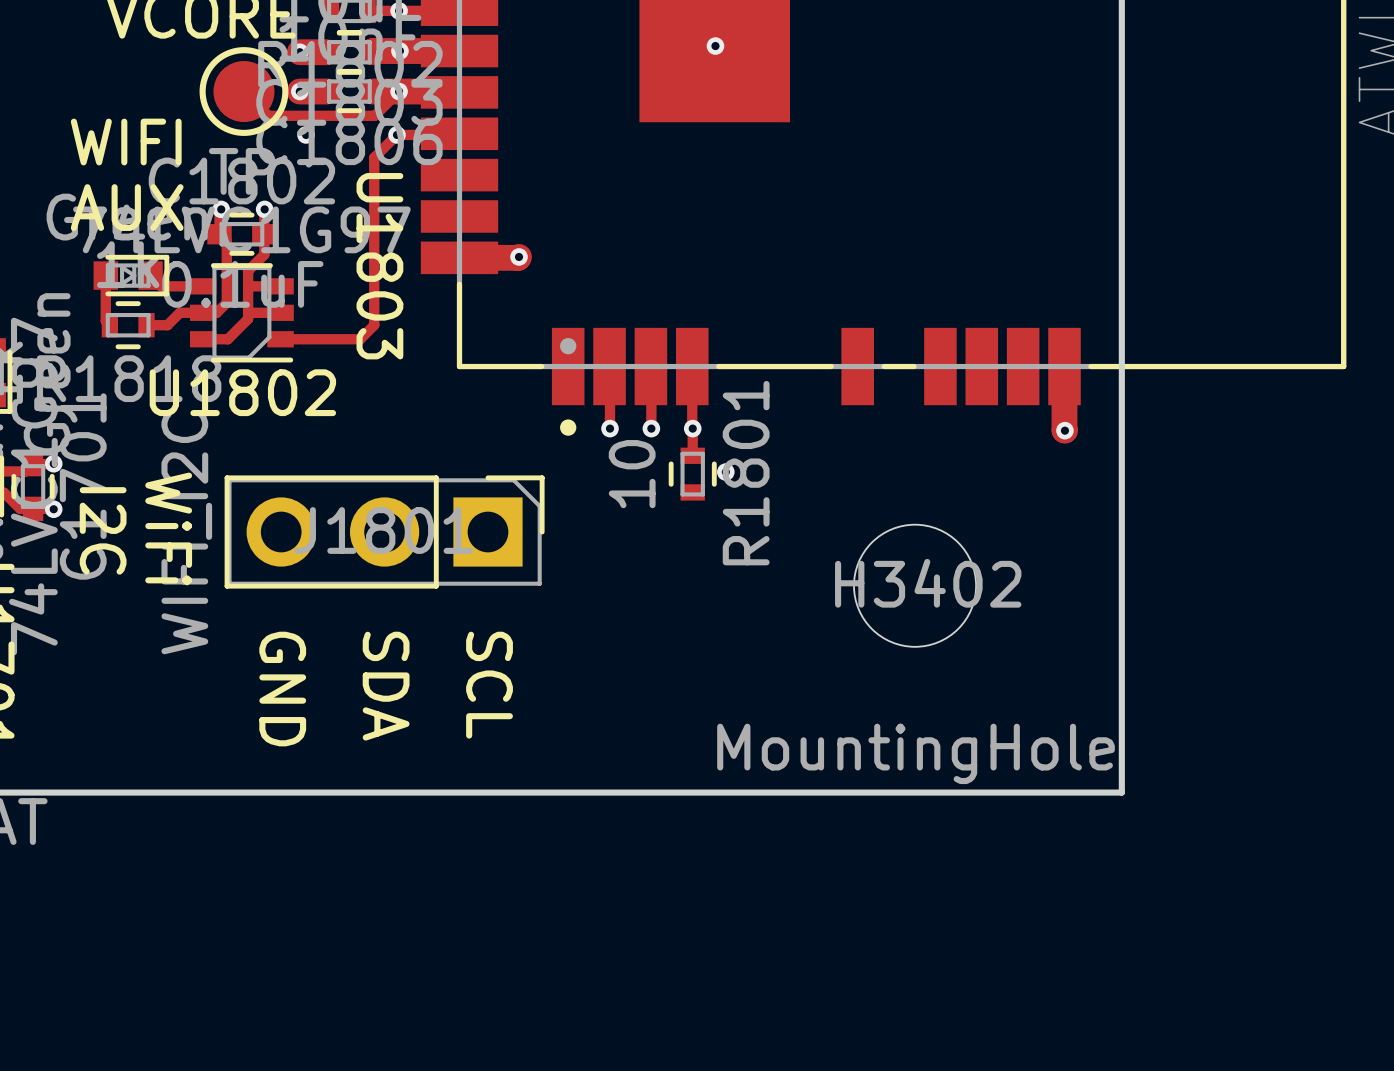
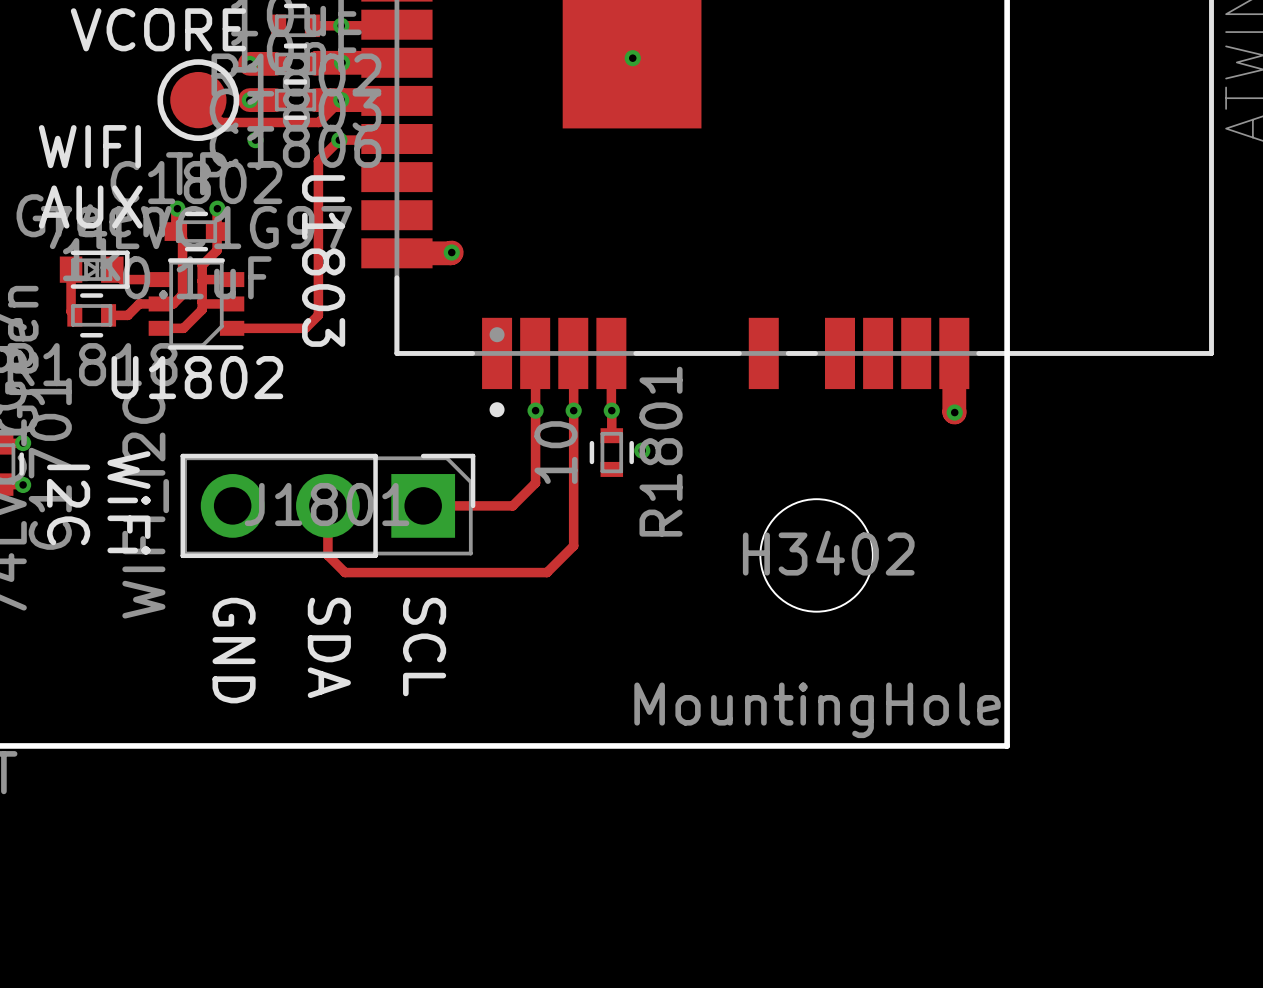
track: none -> (535, 410) (535, 483) (512, 505) (423, 505)
track: none -> (573, 410) (573, 545) (547, 572) (345, 572) (327, 555) (327, 505)

